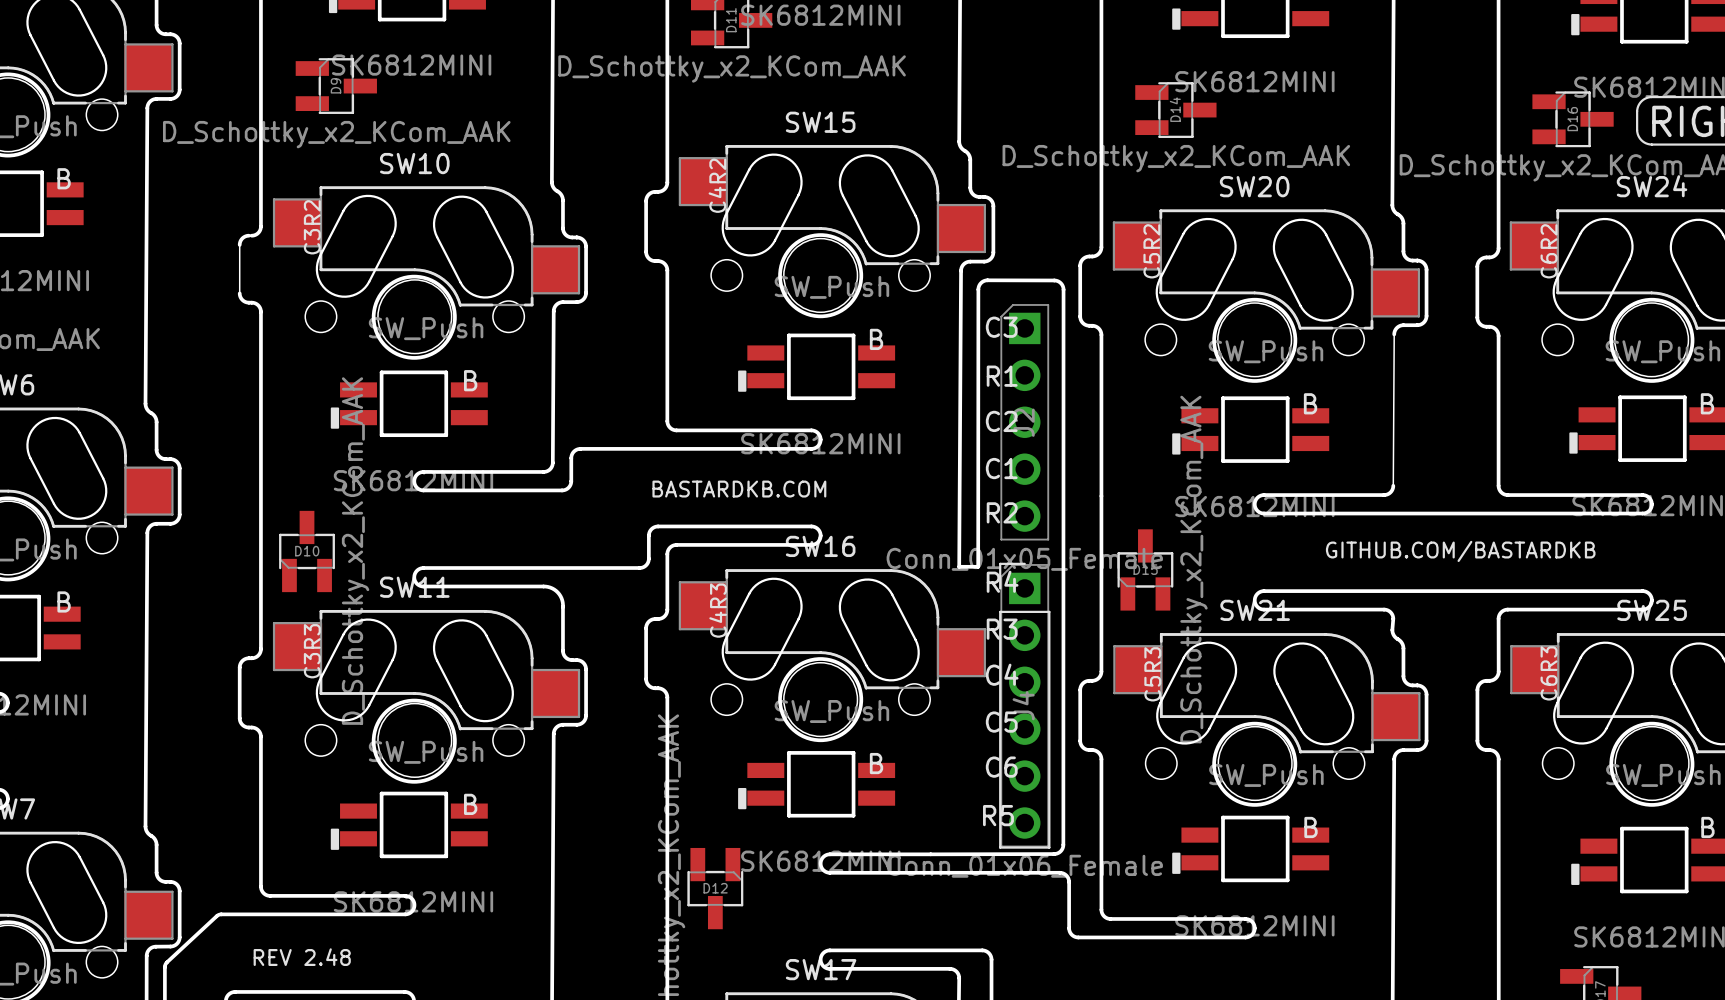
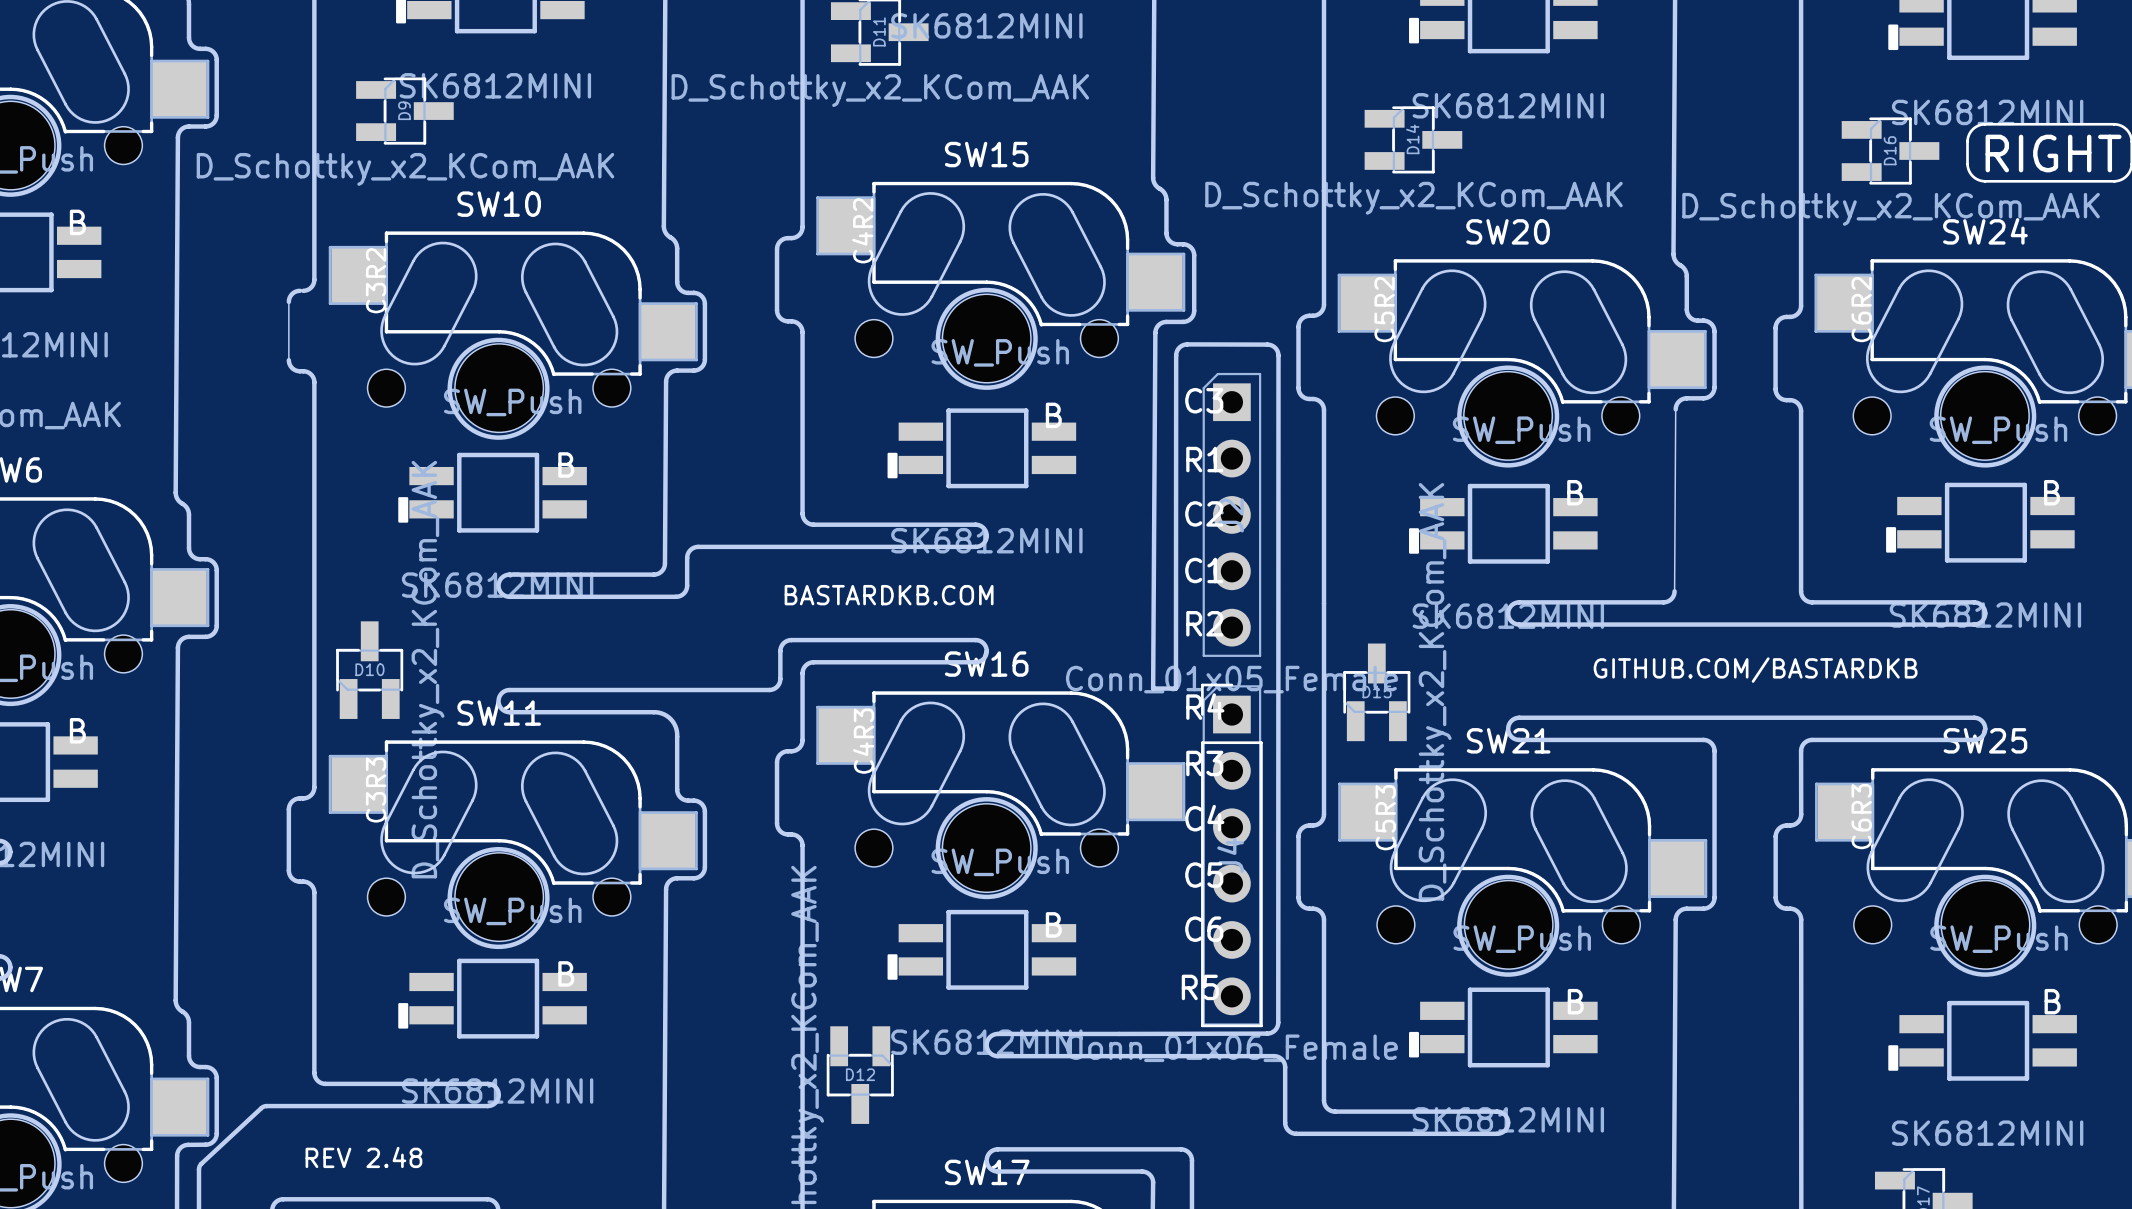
board edge: (1384, 609) (1392, 614) (1392, 633) (1402, 645) (1404, 680) (1409, 684) (1422, 686) (1426, 694) -> (1663, 739) (1704, 740) (1713, 746) (1714, 842)

